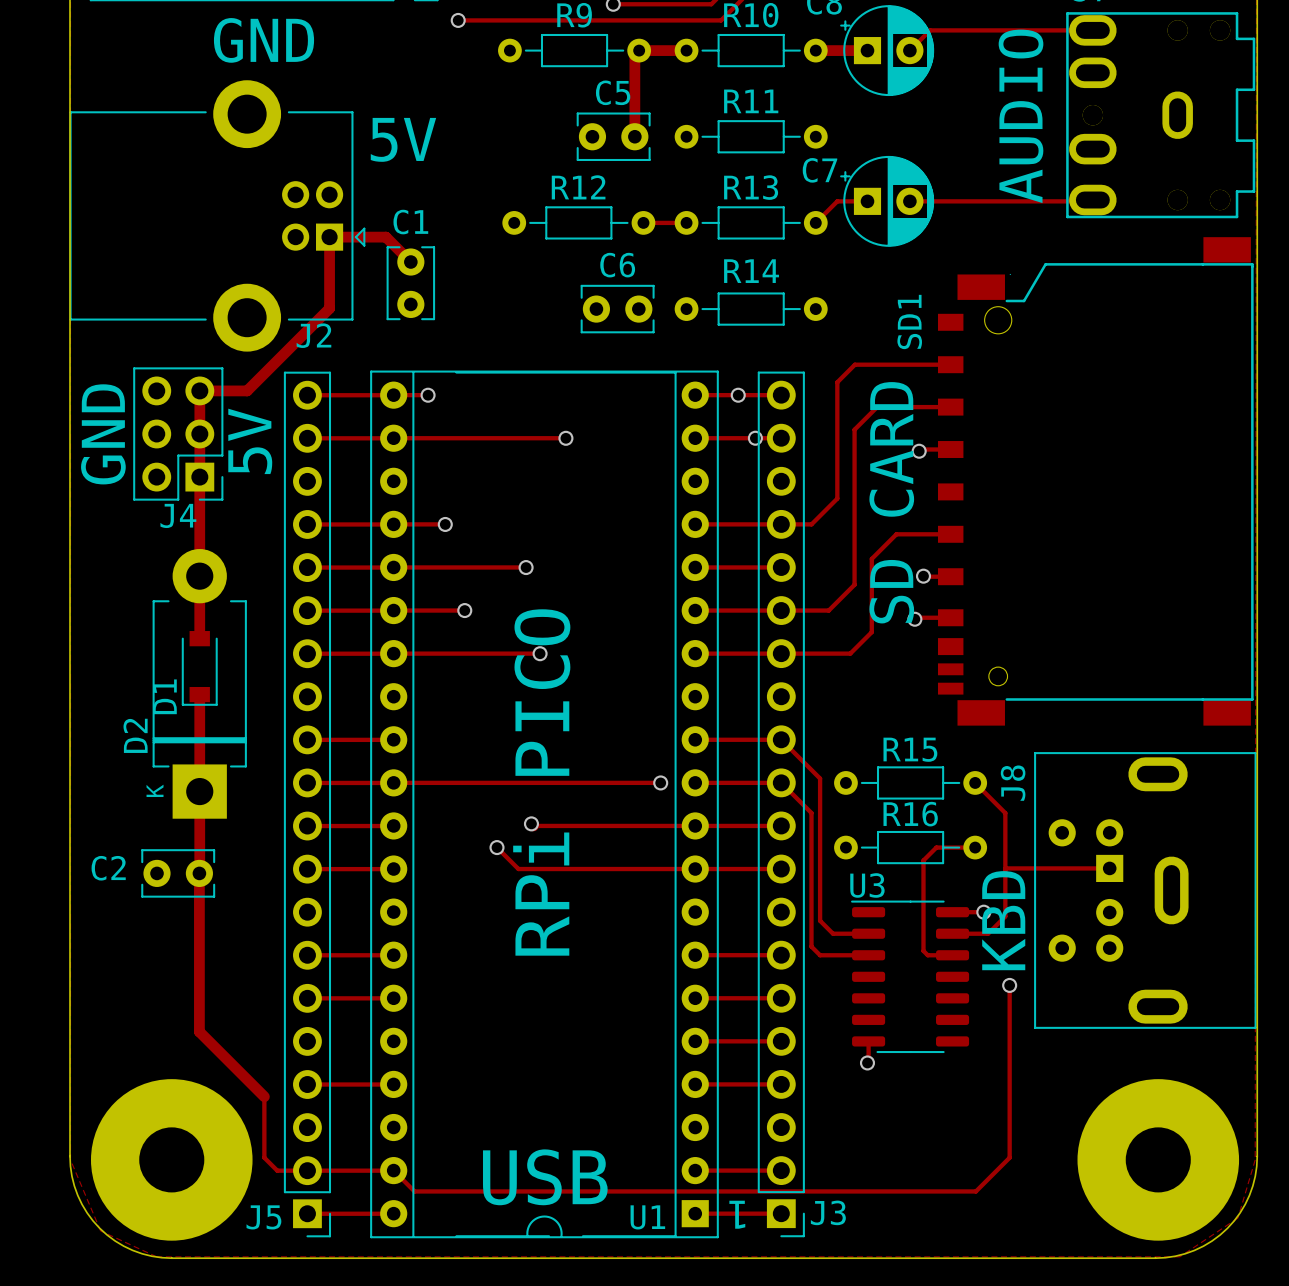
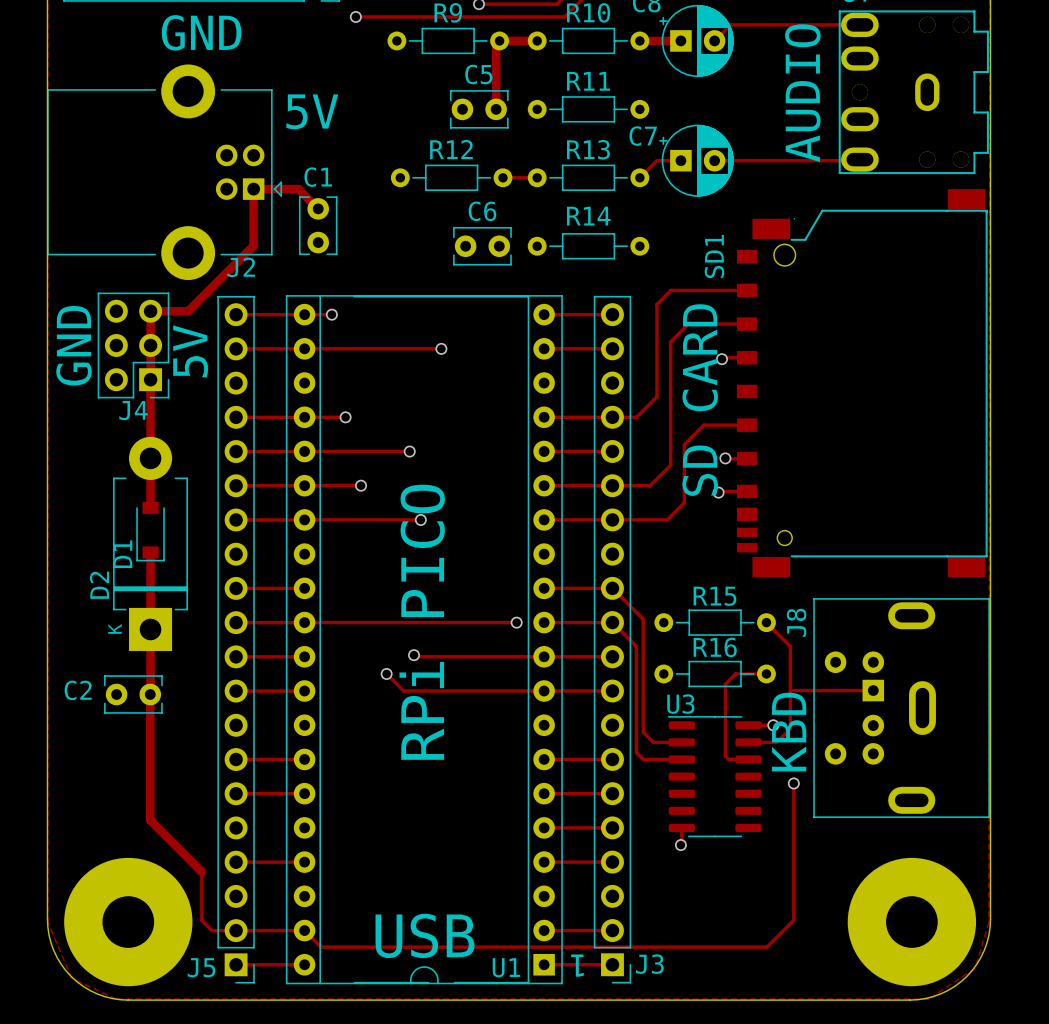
via: (738, 395) -> none
via: (755, 438) -> none

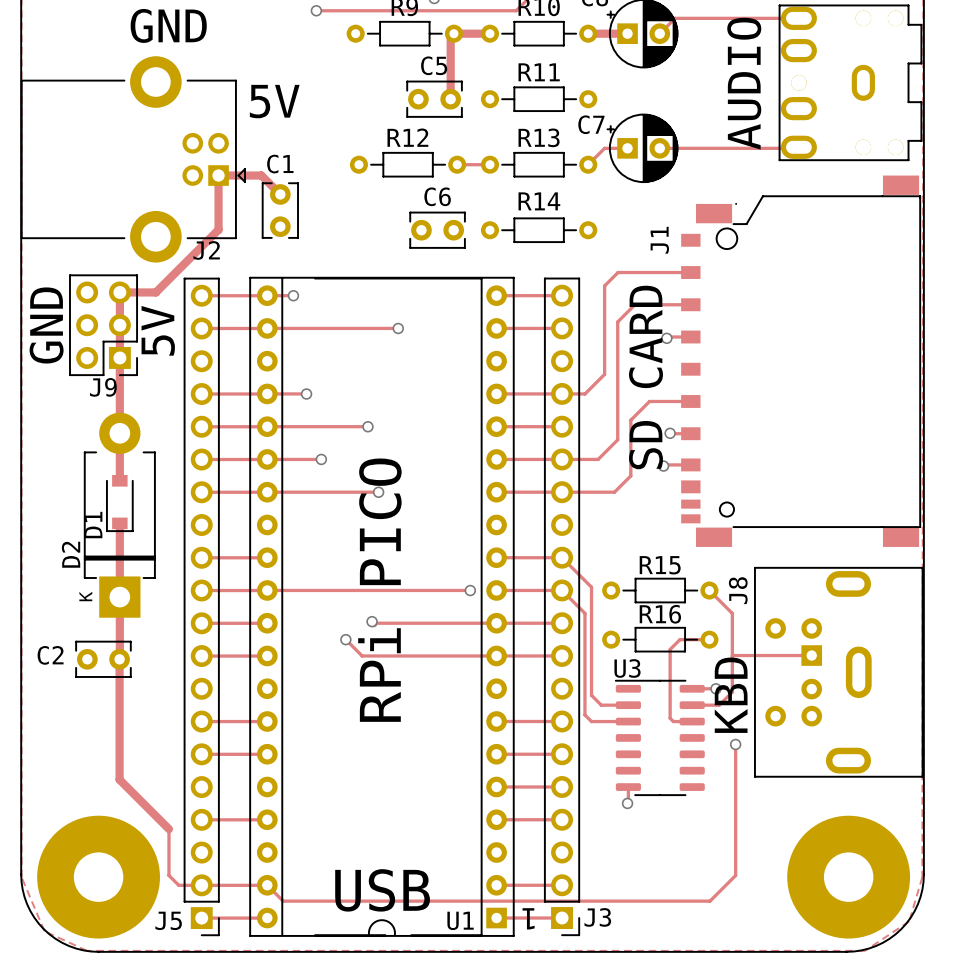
SD1 name: SD1 (714, 256) -> J1 (659, 240)
J4 name: J4 (133, 410) -> J9 (103, 387)

